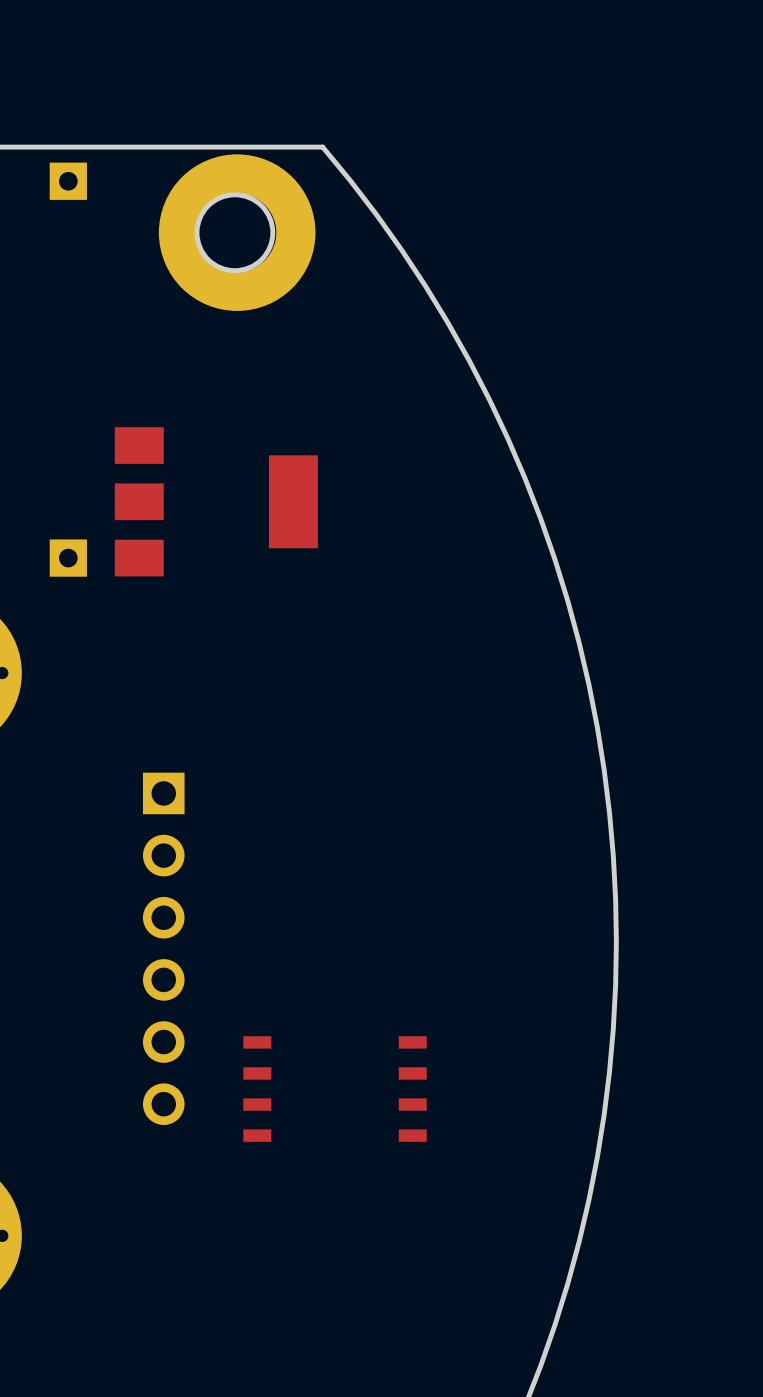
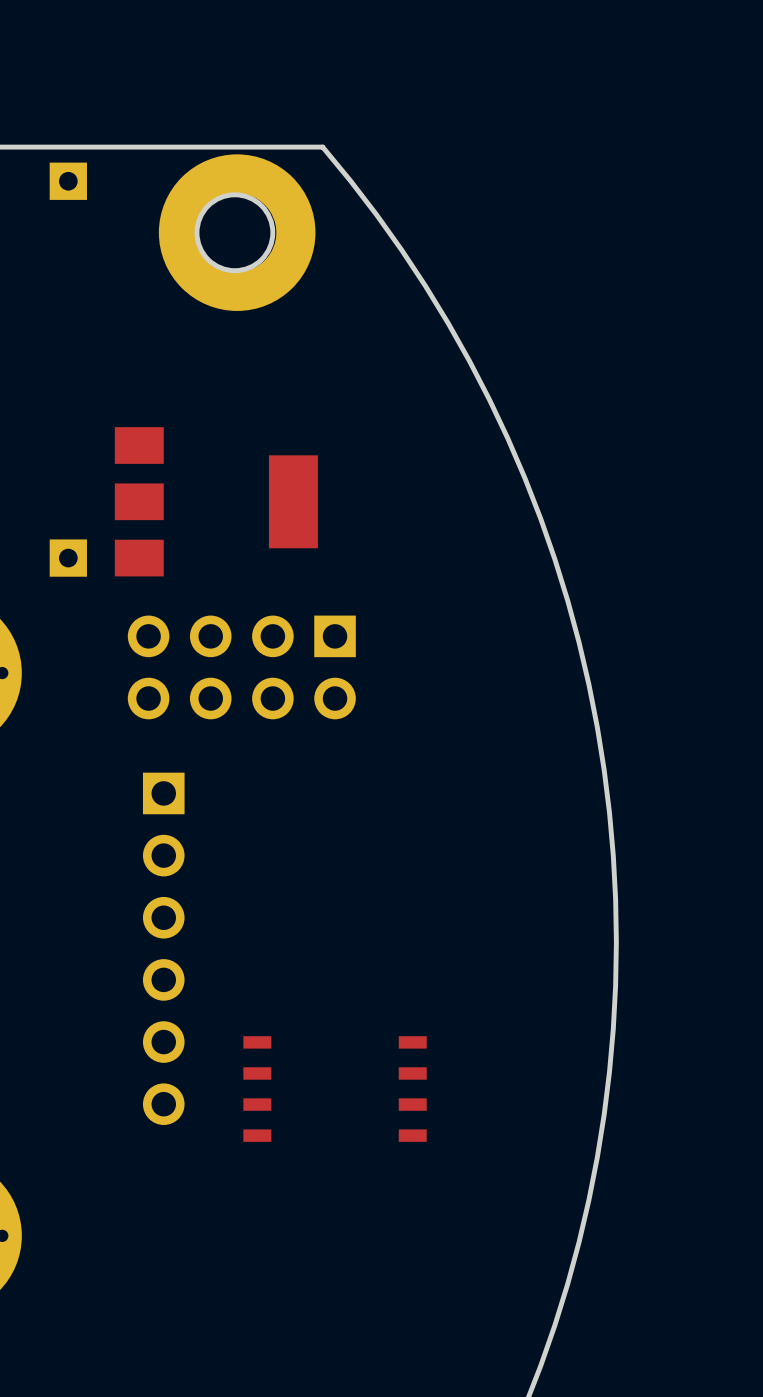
part: none -> (241, 667)

